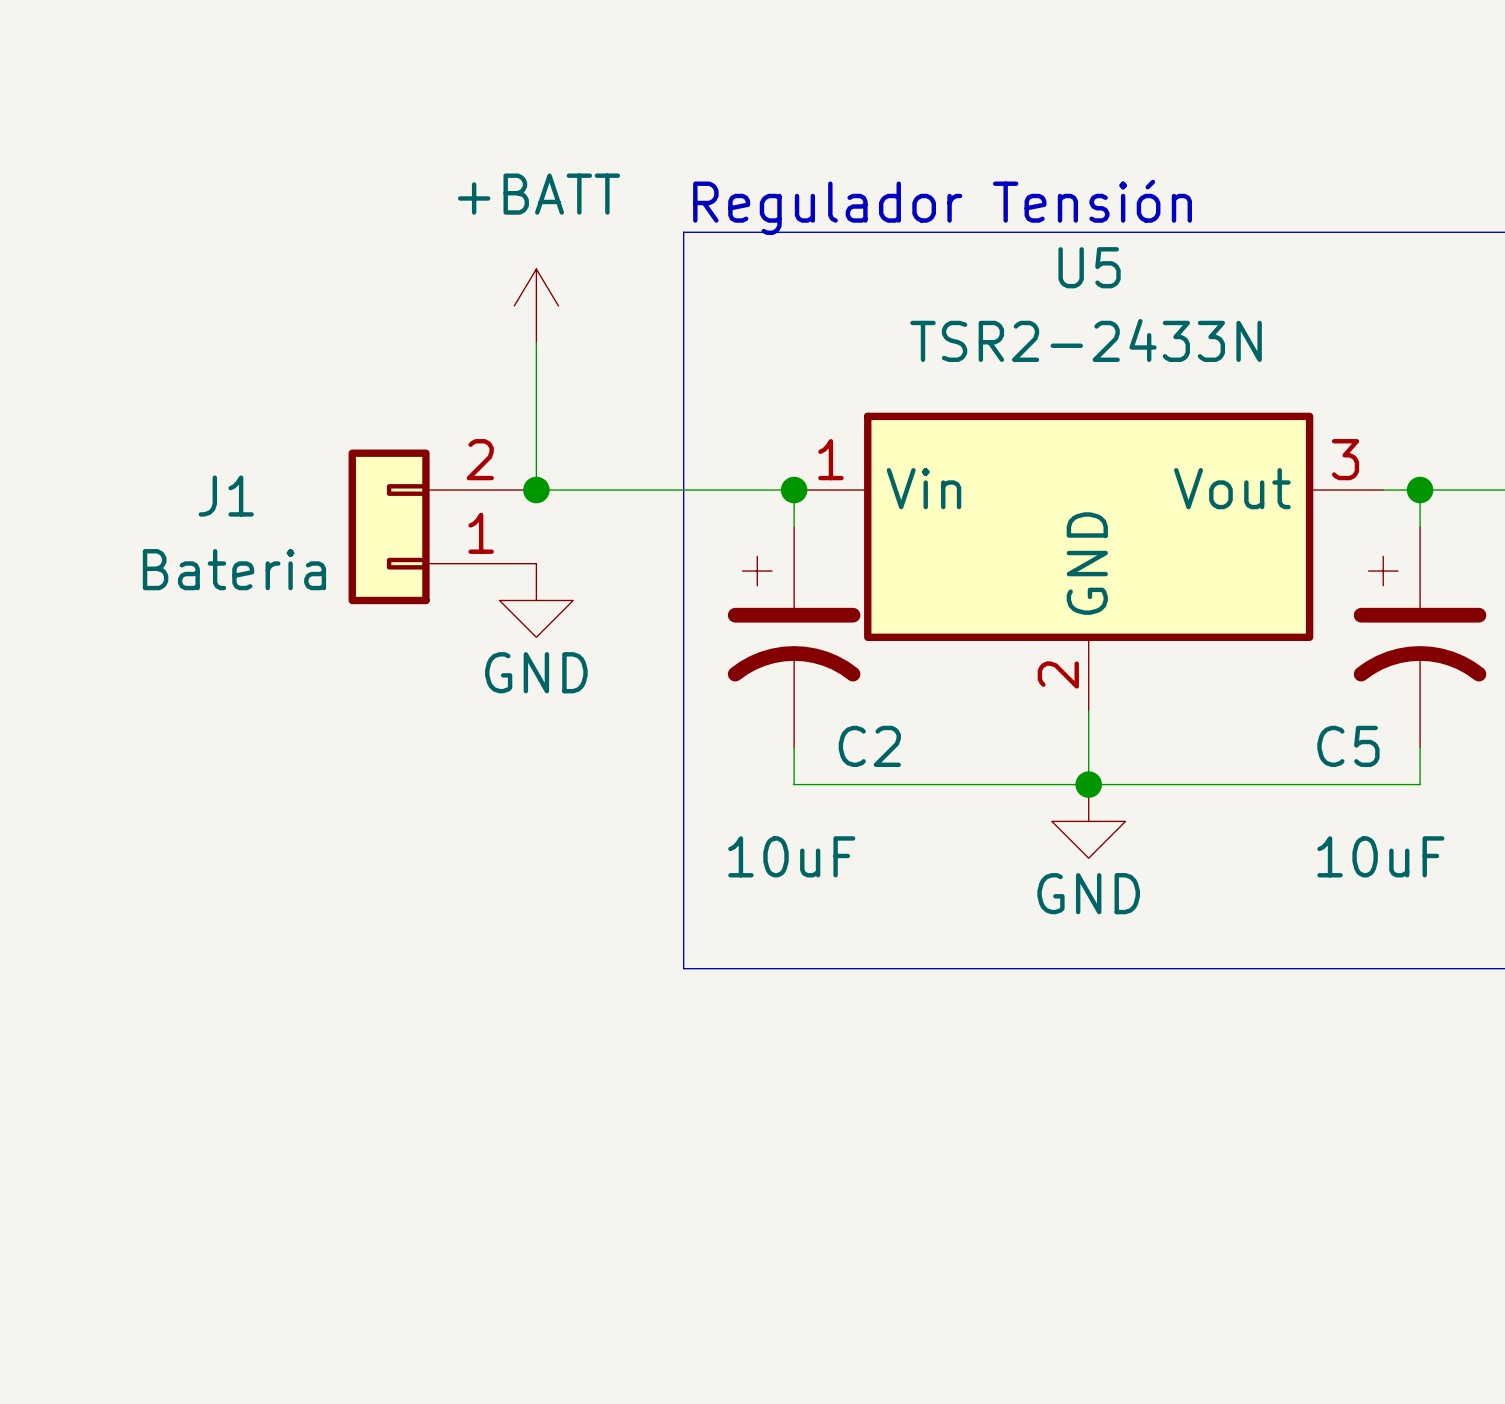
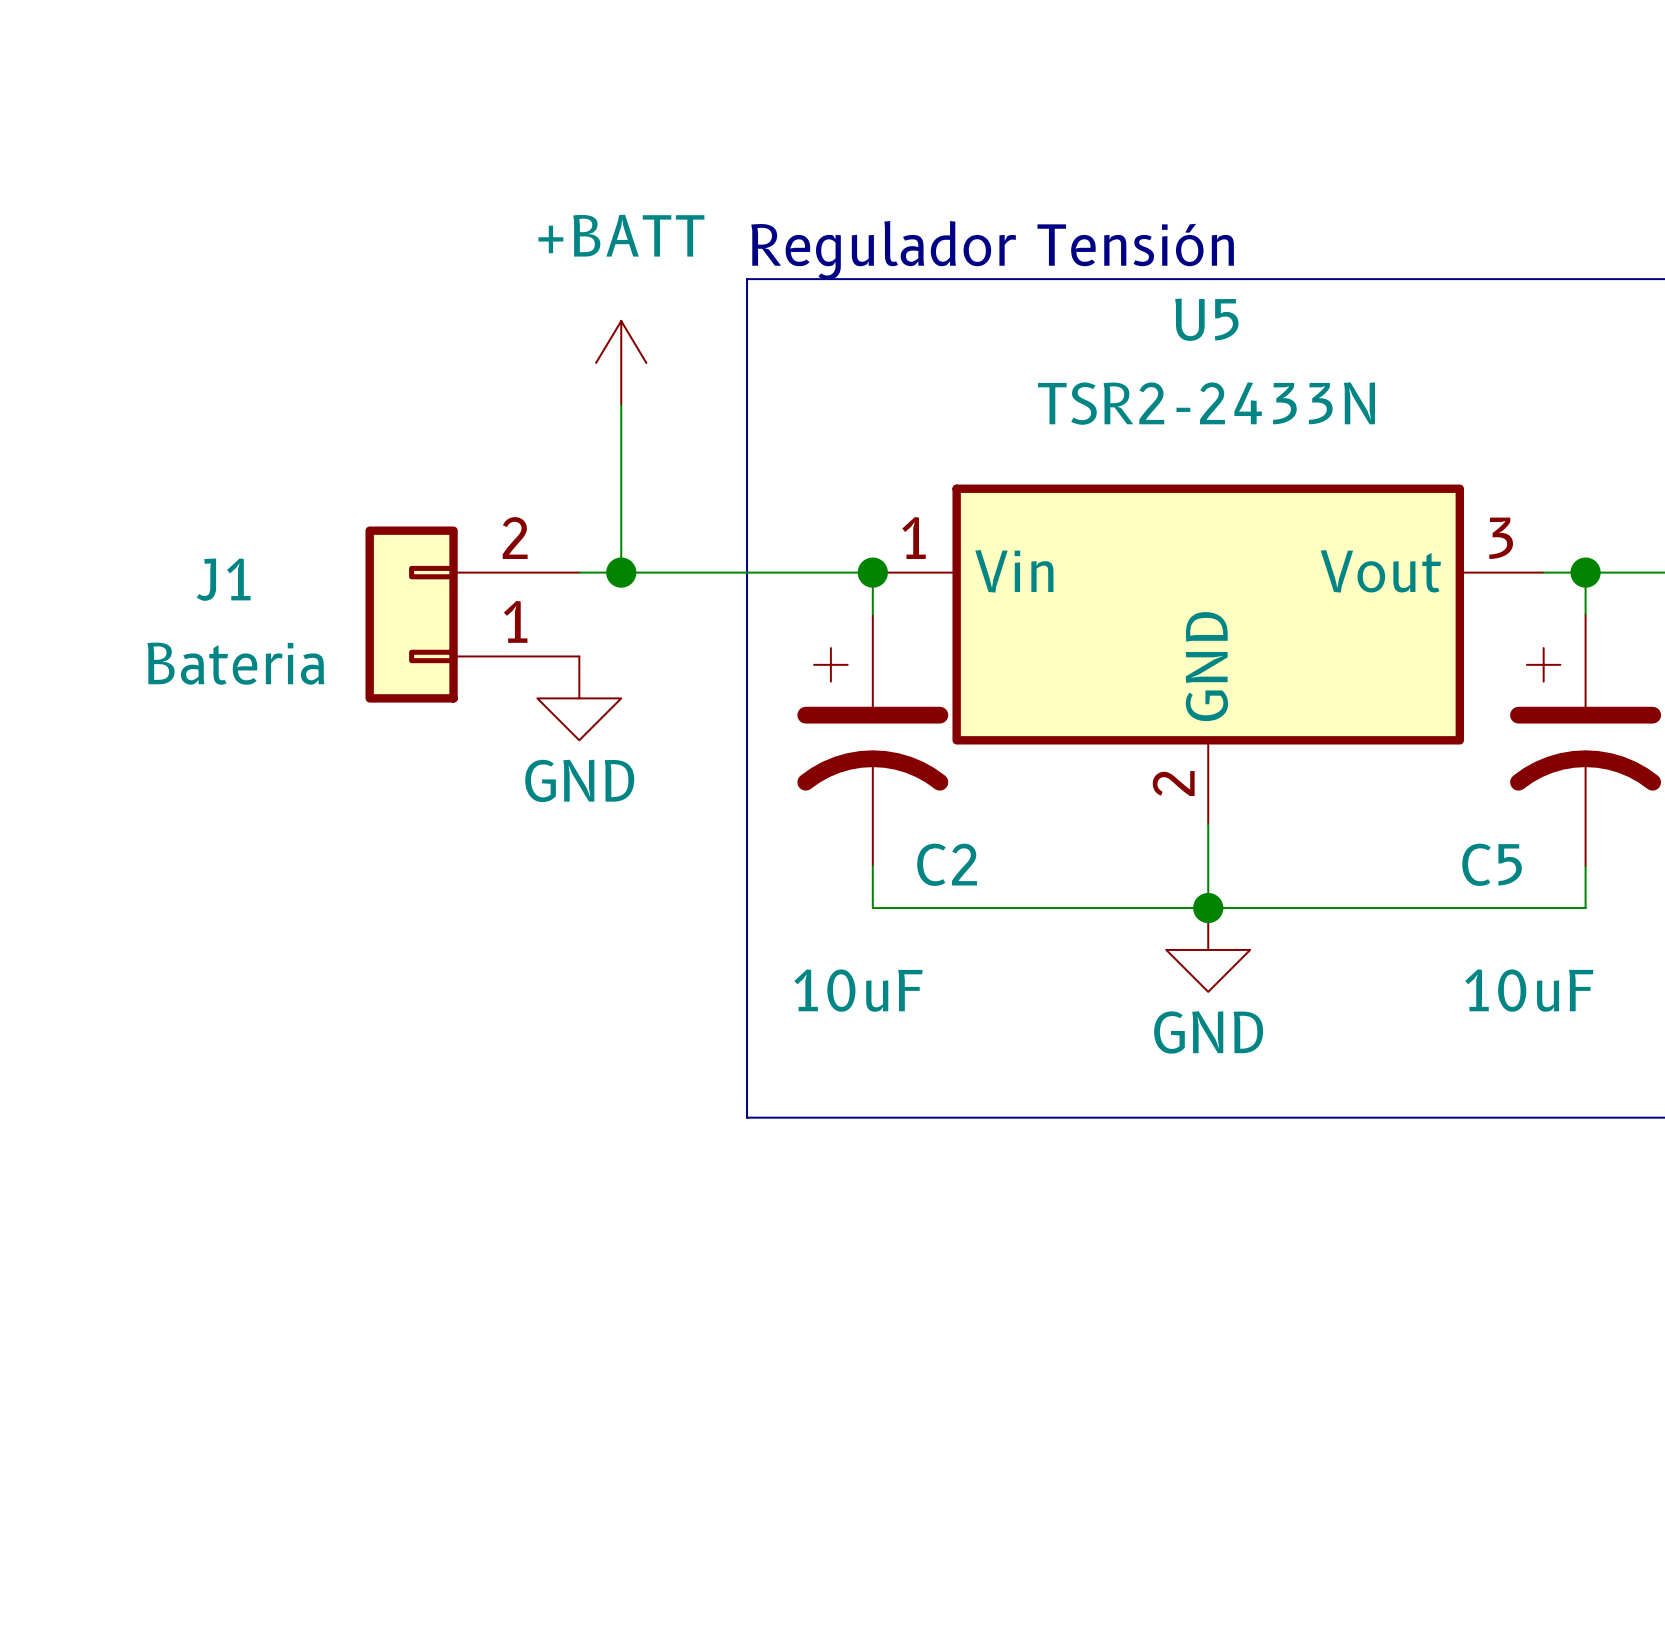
power symbol position: +BATT (536, 305) -> +BATT (621, 362)
wire: (536, 342) (536, 490) -> (621, 404) (621, 572)
junction position: (536, 490) -> (621, 572)

